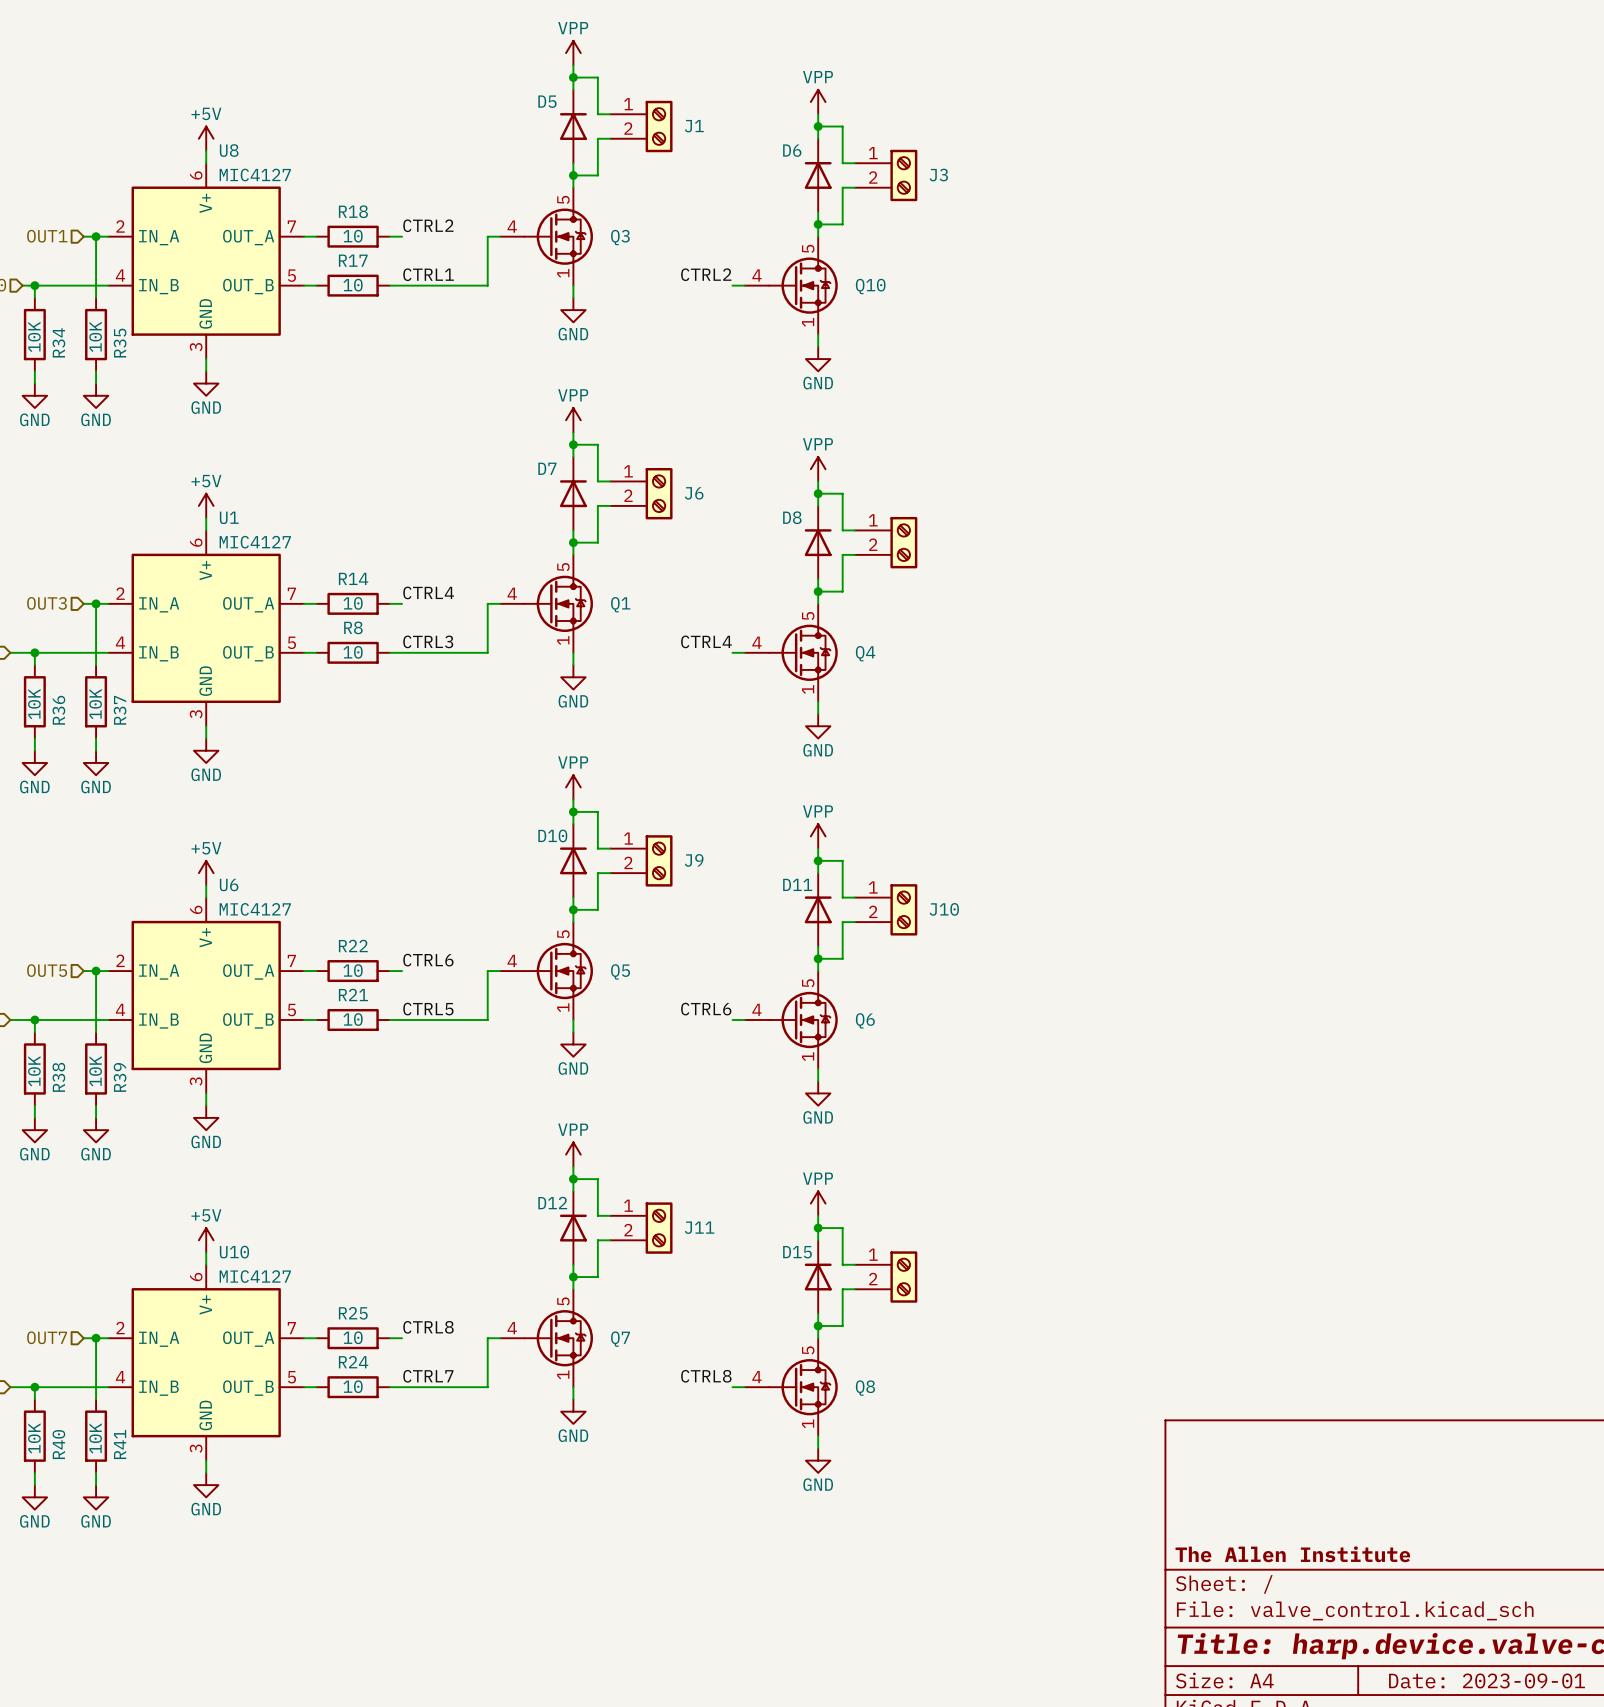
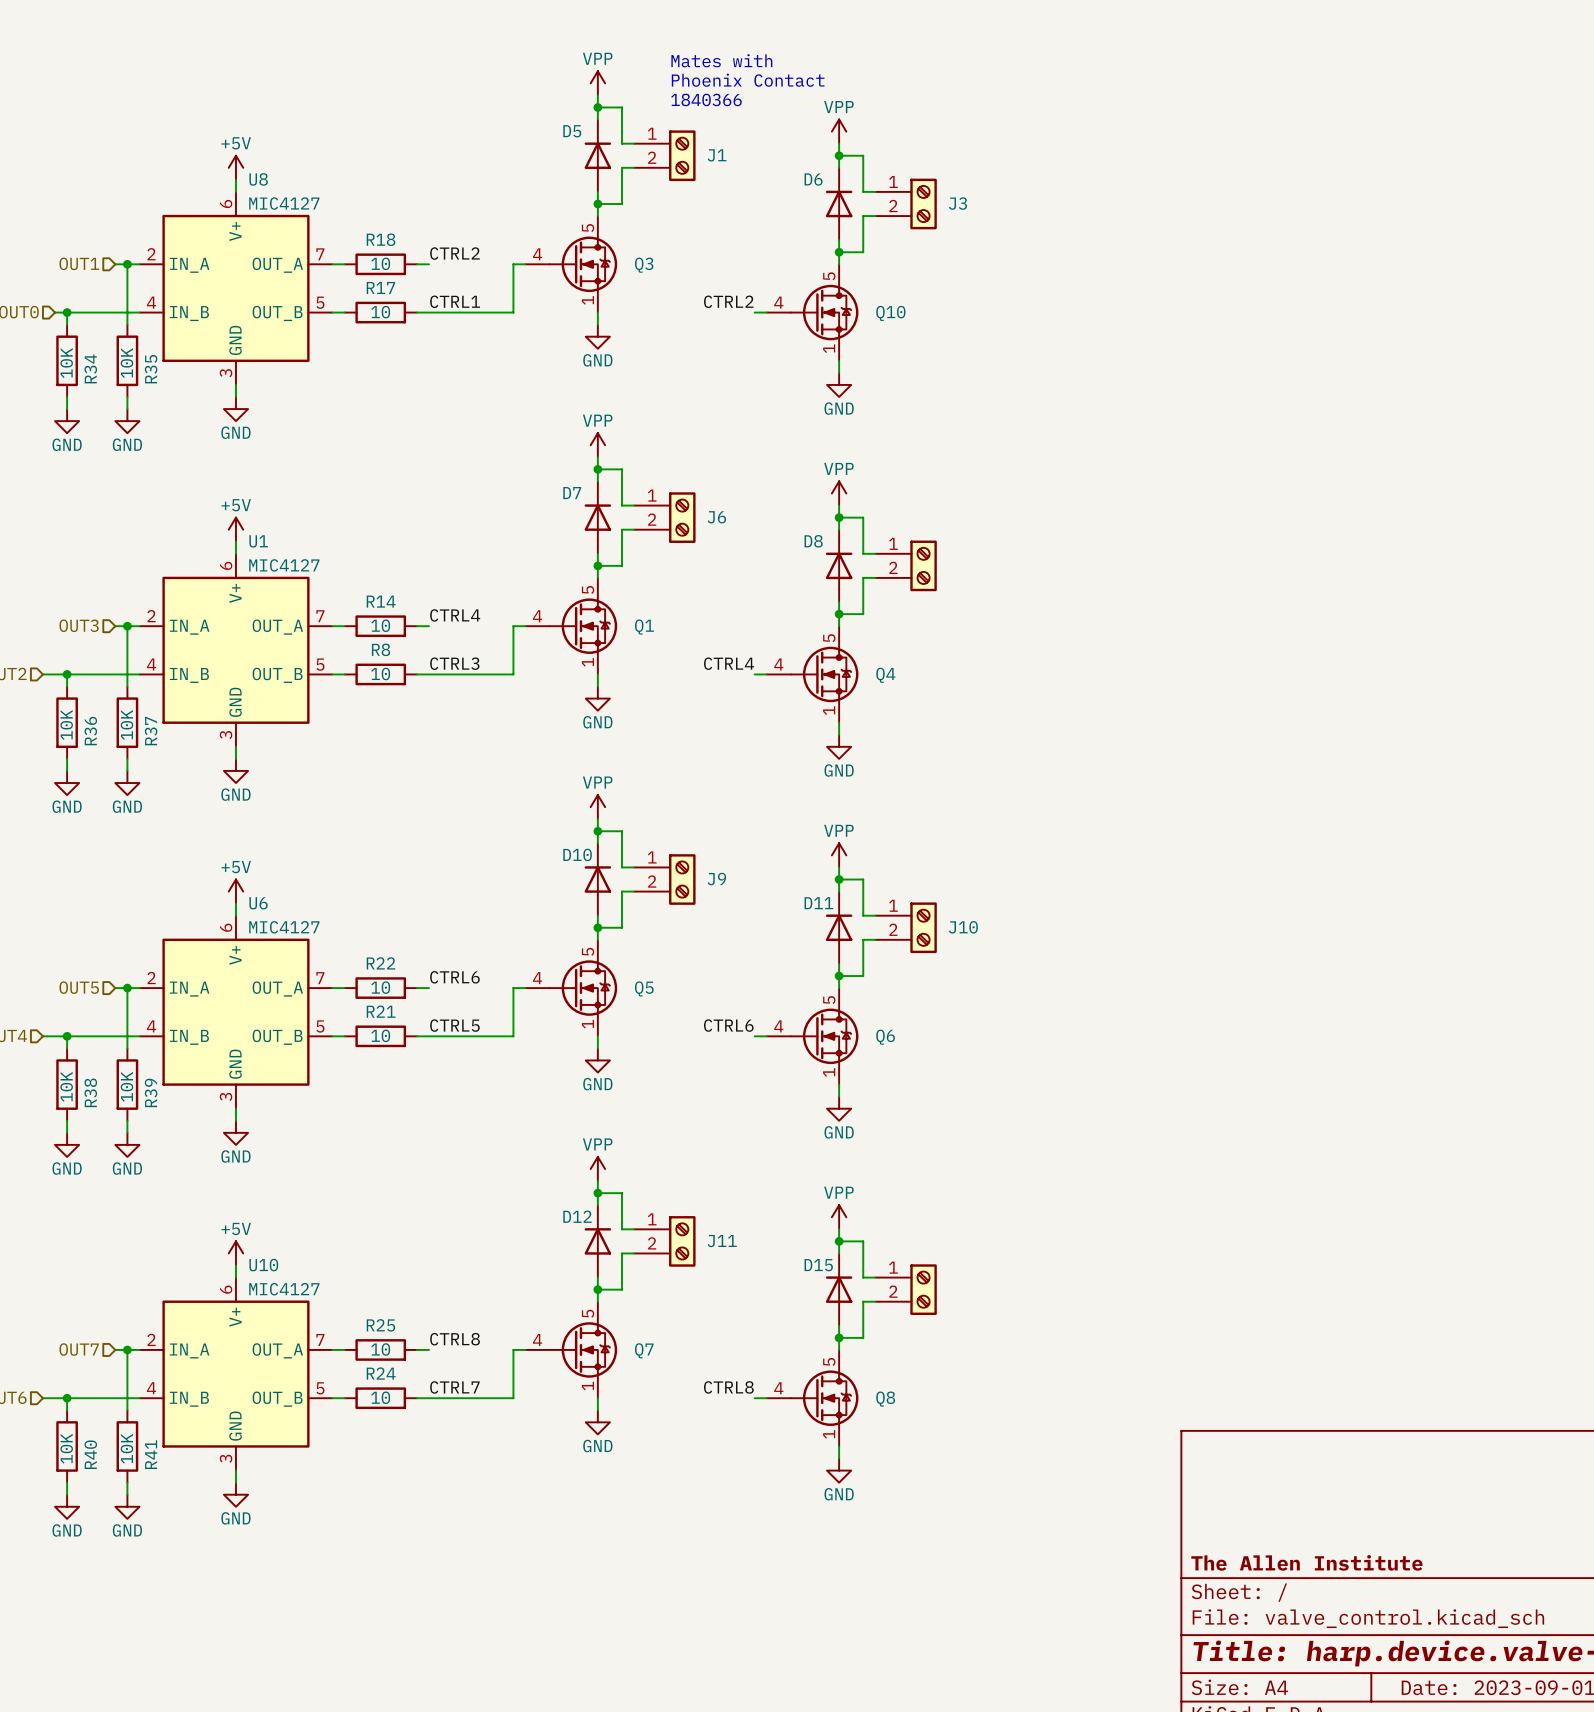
text: none -> Mates with (721, 60)
text: none -> Phoenix Contact (748, 80)
text: none -> 1840366 (706, 99)

